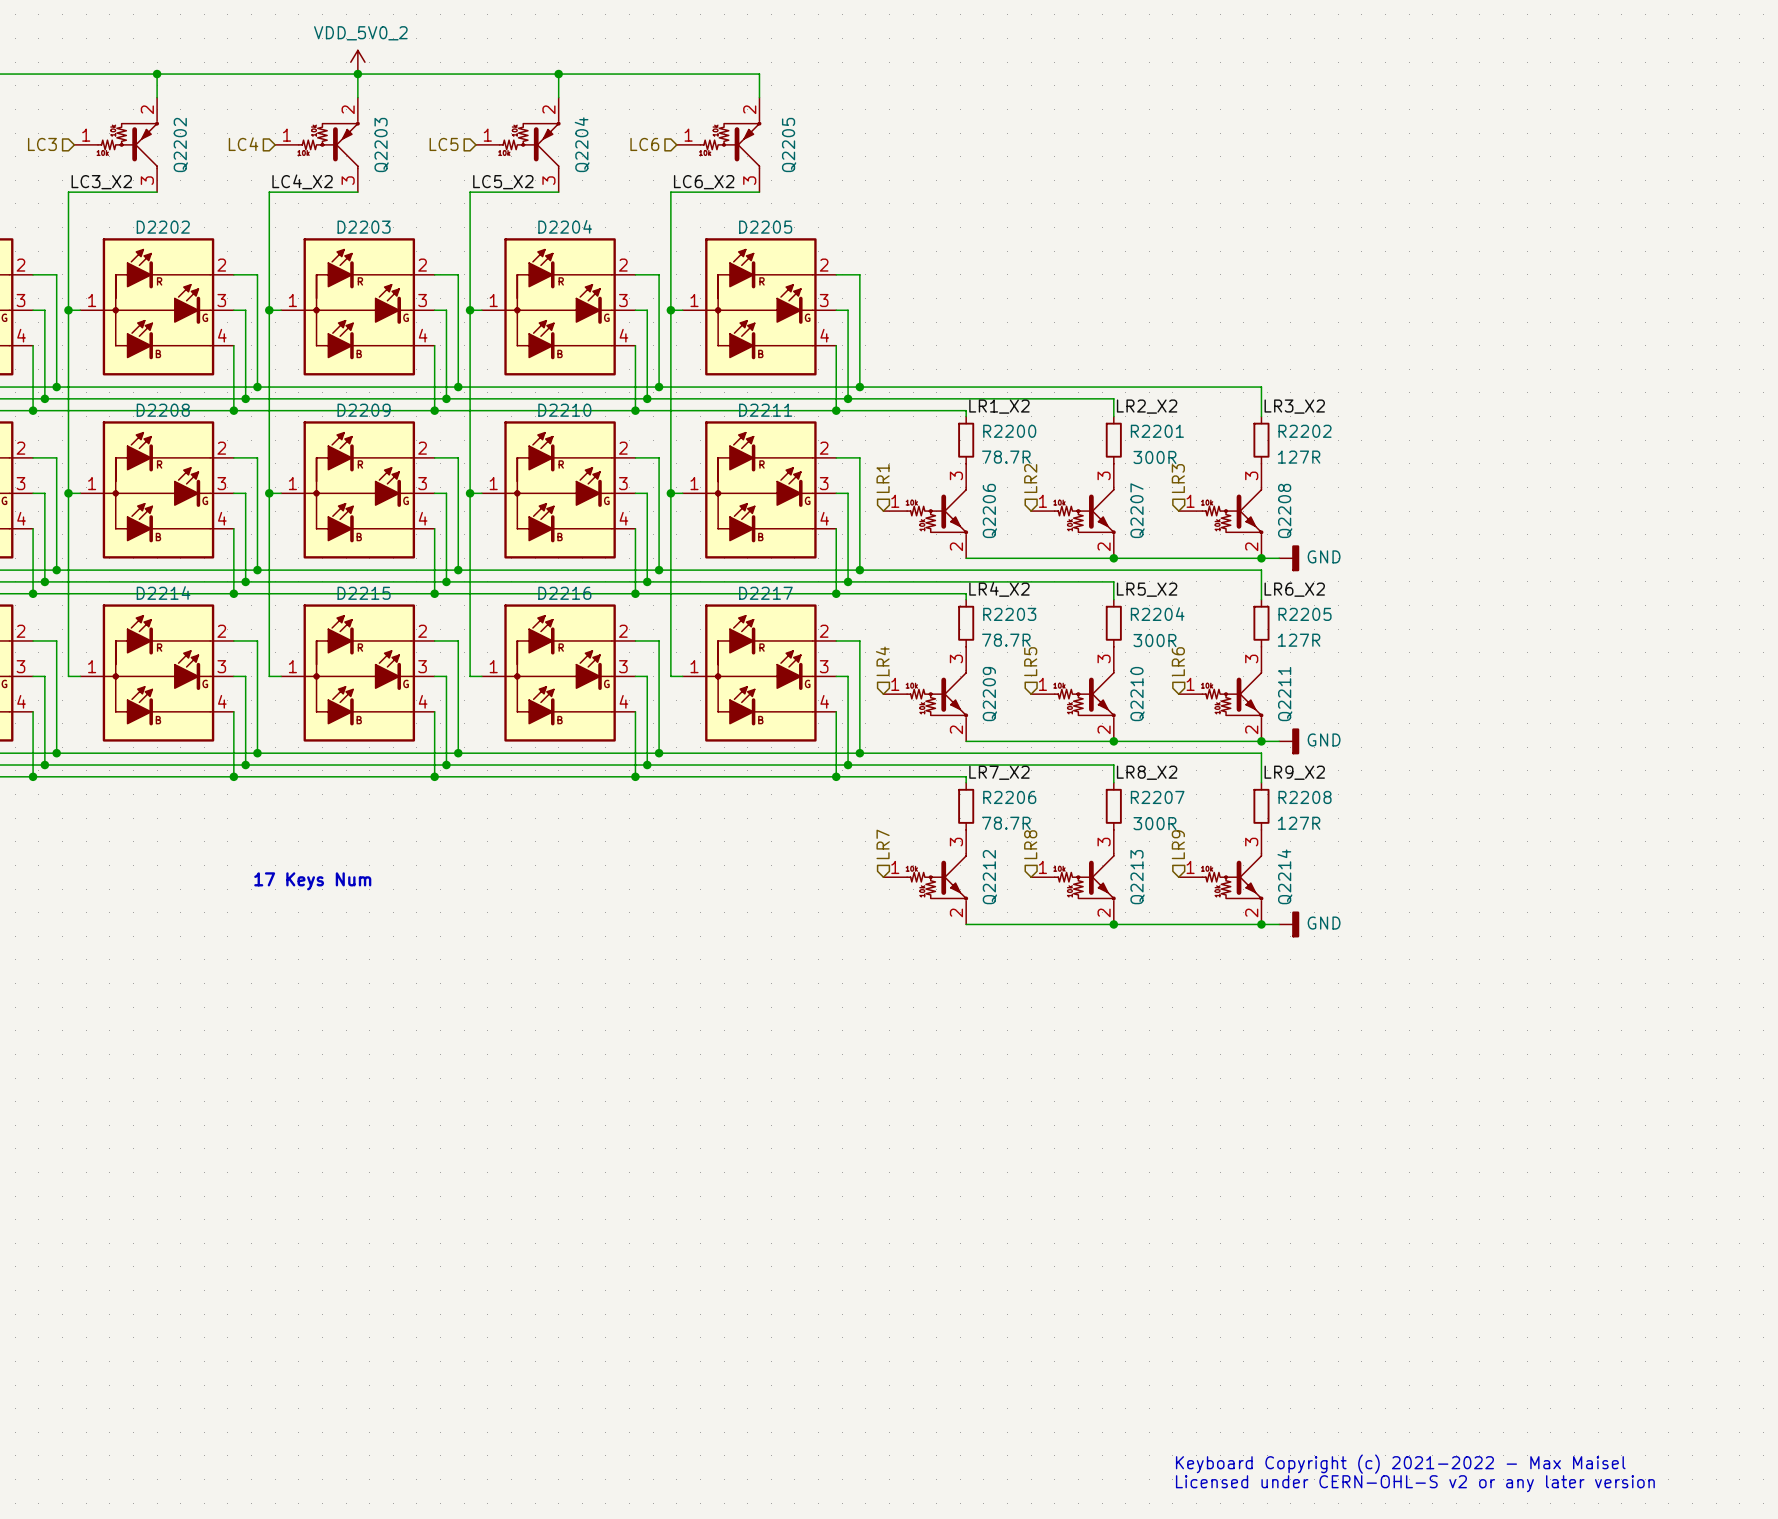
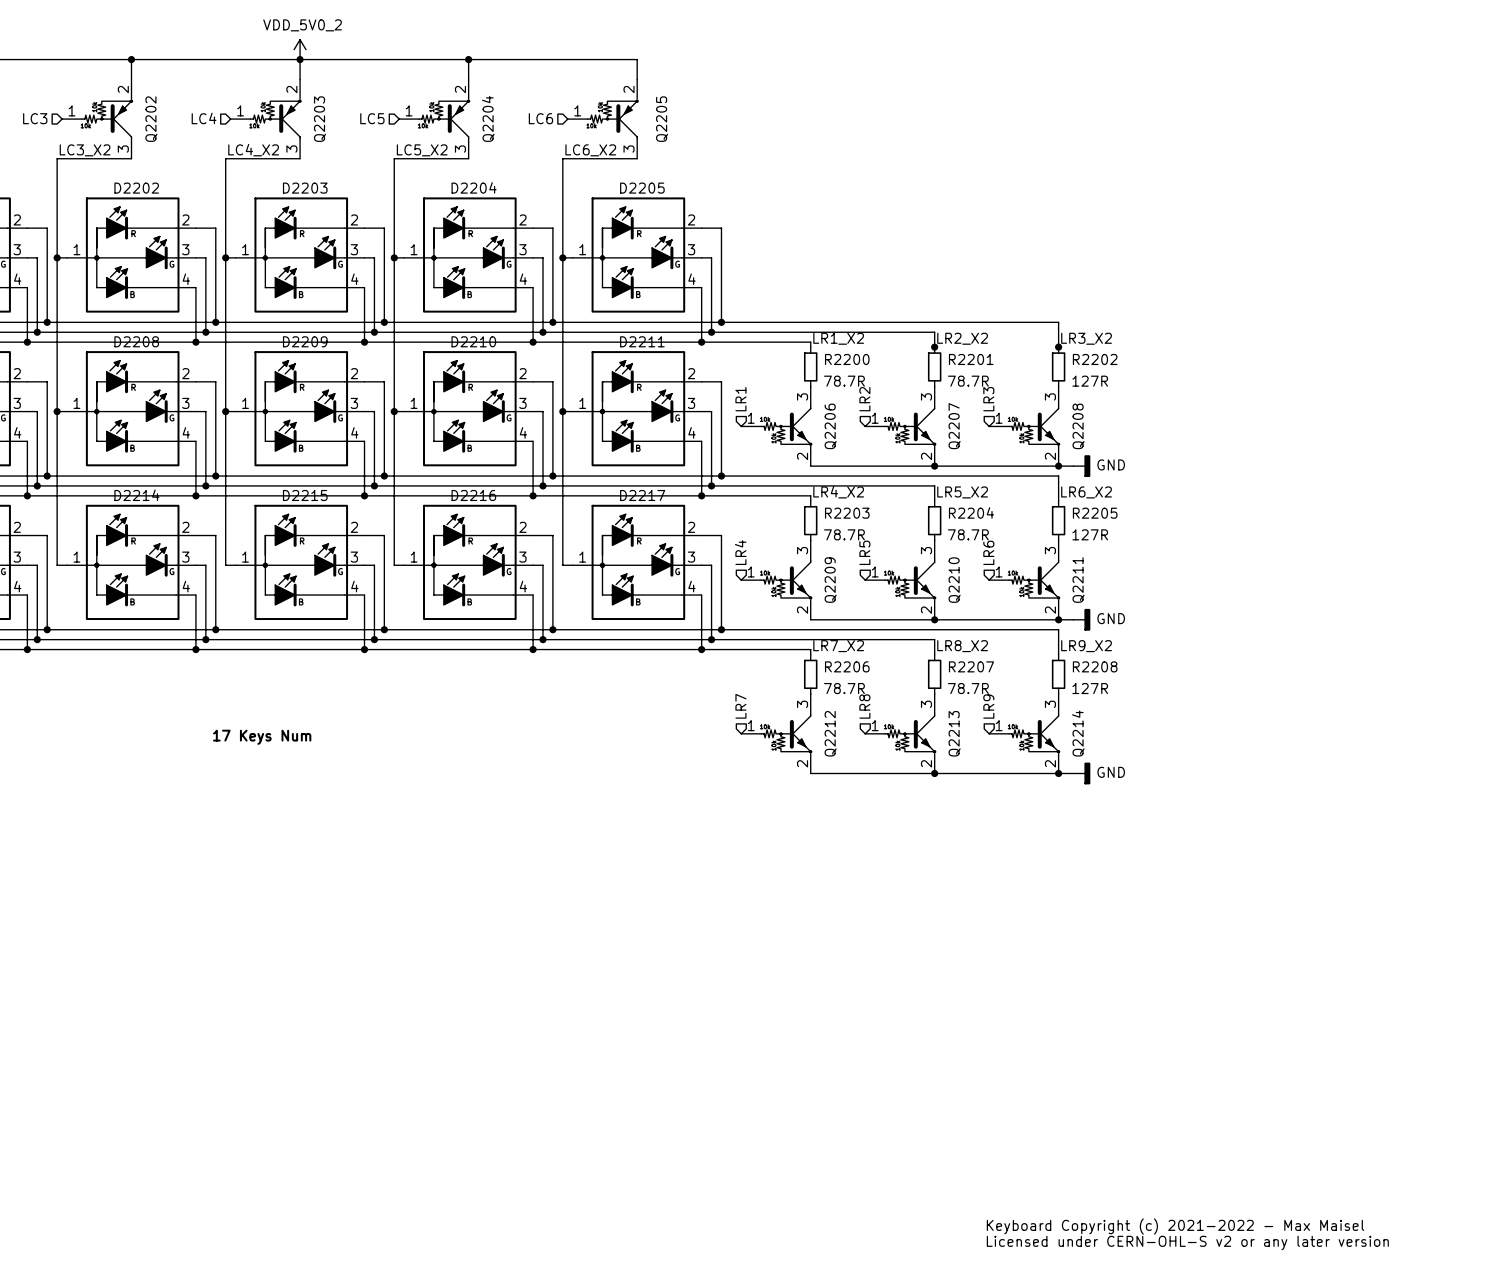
junction: none -> (934, 347)
junction: none -> (1058, 347)
R2201 value: 300R (1154, 457) -> 78.7R (968, 381)
R2204 value: 300R (1154, 640) -> 78.7R (968, 534)
R2207 value: 300R (1154, 823) -> 78.7R (968, 688)

